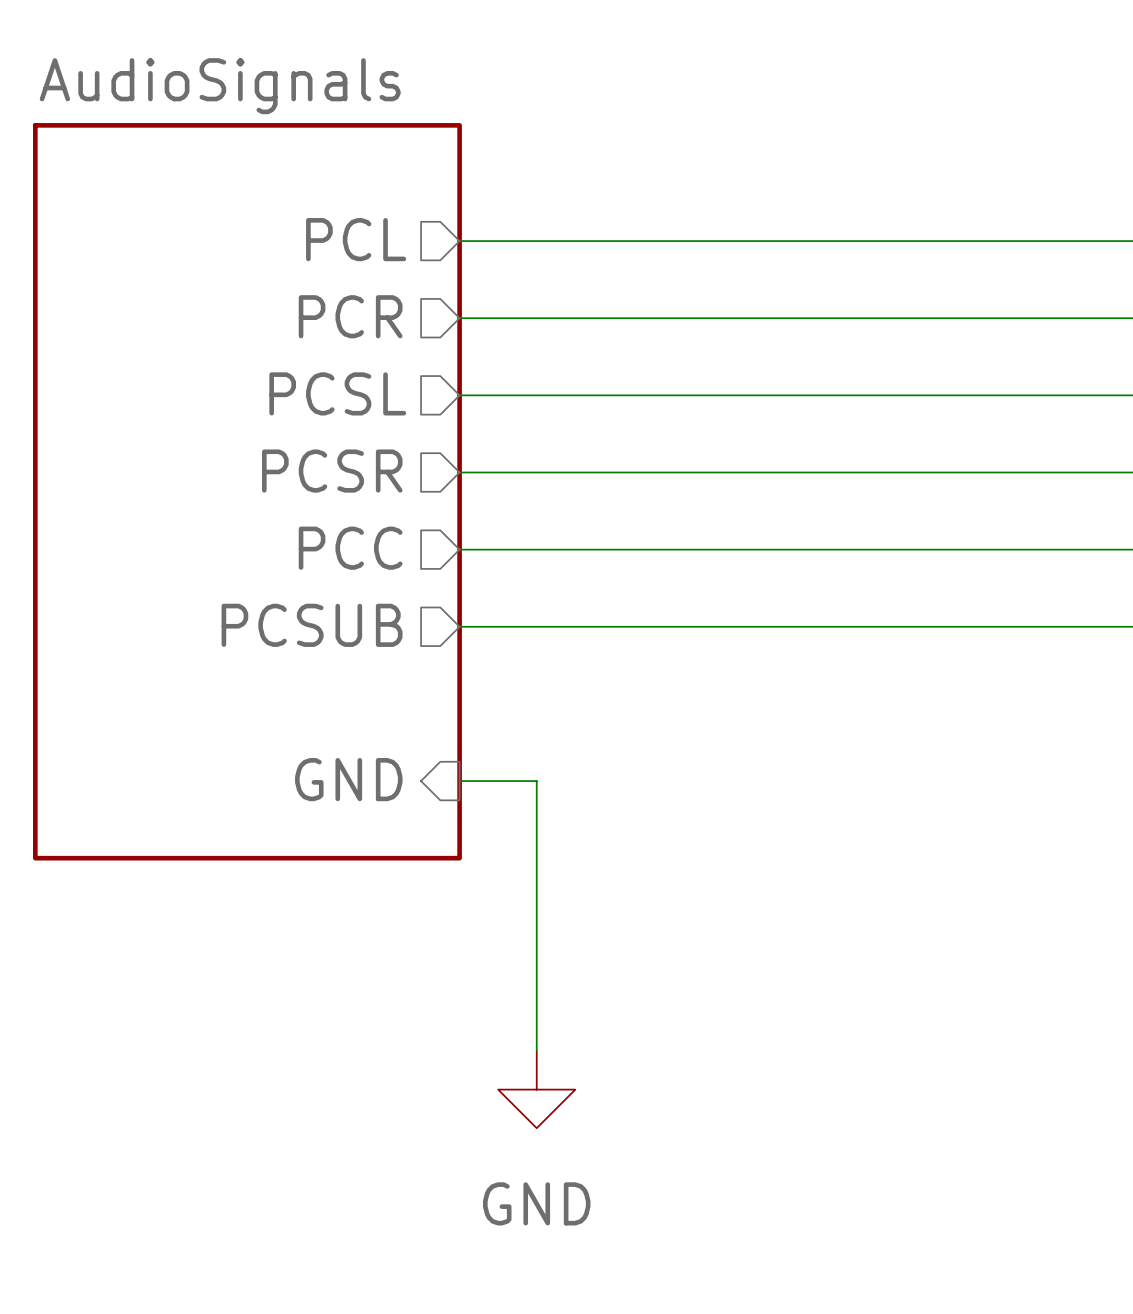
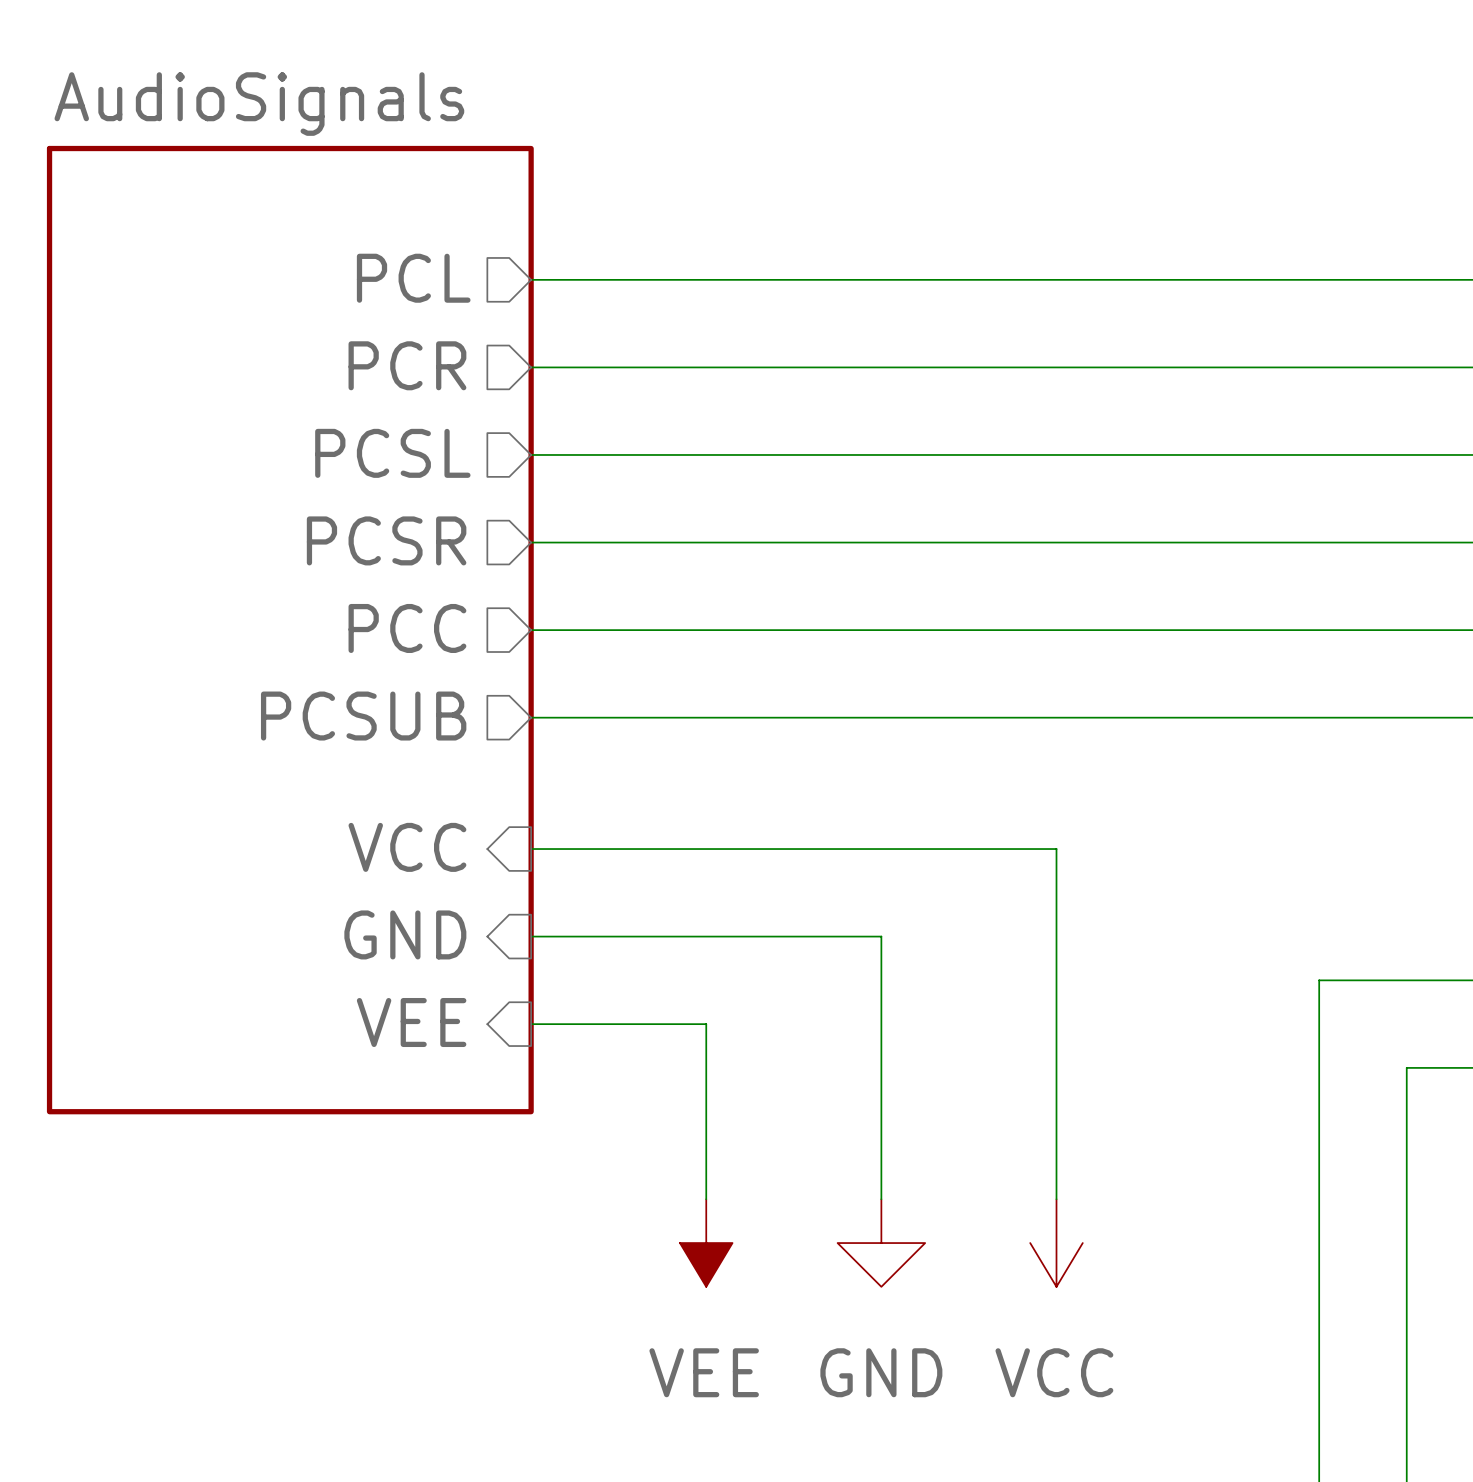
sheet AudioSignals: (247, 491) -> none
sheet AudioSignals: none -> (290, 630)
sheet pin: none -> VCC (407, 847)
wire: none -> (531, 849) (1056, 849) (1056, 1199)
sheet pin position: GND (348, 779) -> GND (405, 934)
wire: (459, 781) (536, 781) (536, 1051) -> none
wire: none -> (531, 936) (881, 936) (881, 1199)
sheet pin: none -> VEE (411, 1022)
wire: none -> (531, 1024) (706, 1024) (706, 1199)
power symbol position: GND (536, 1089) -> GND (881, 1243)
power symbol: none -> VEE (706, 1243)
power symbol: none -> VCC (1056, 1243)

